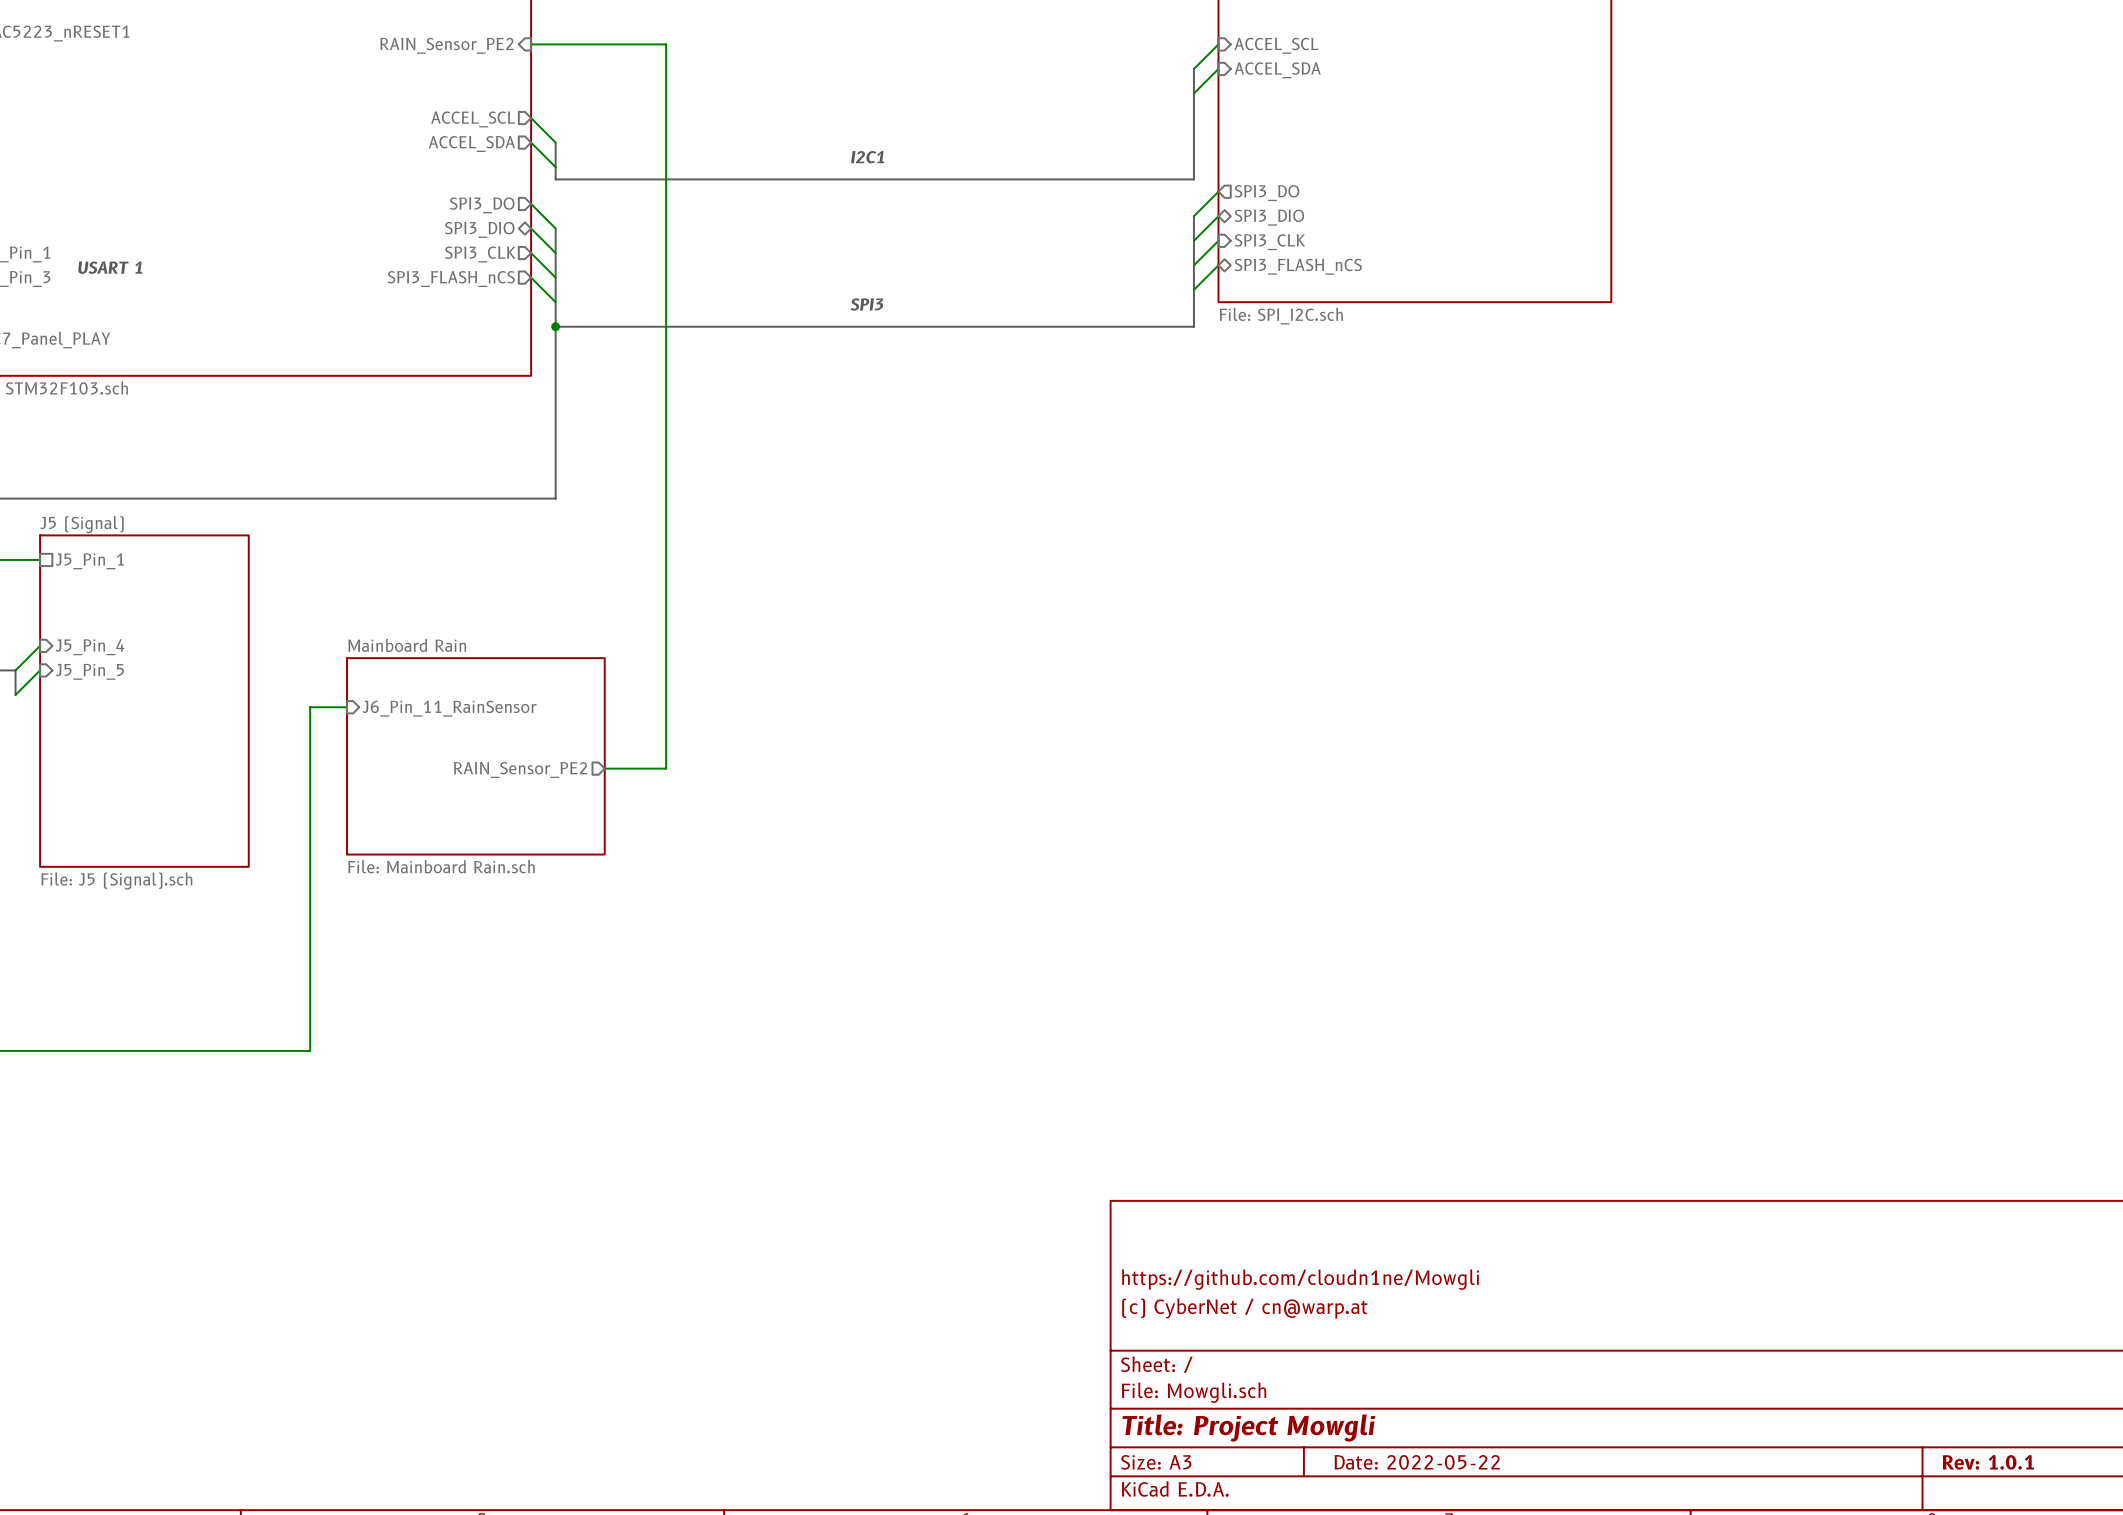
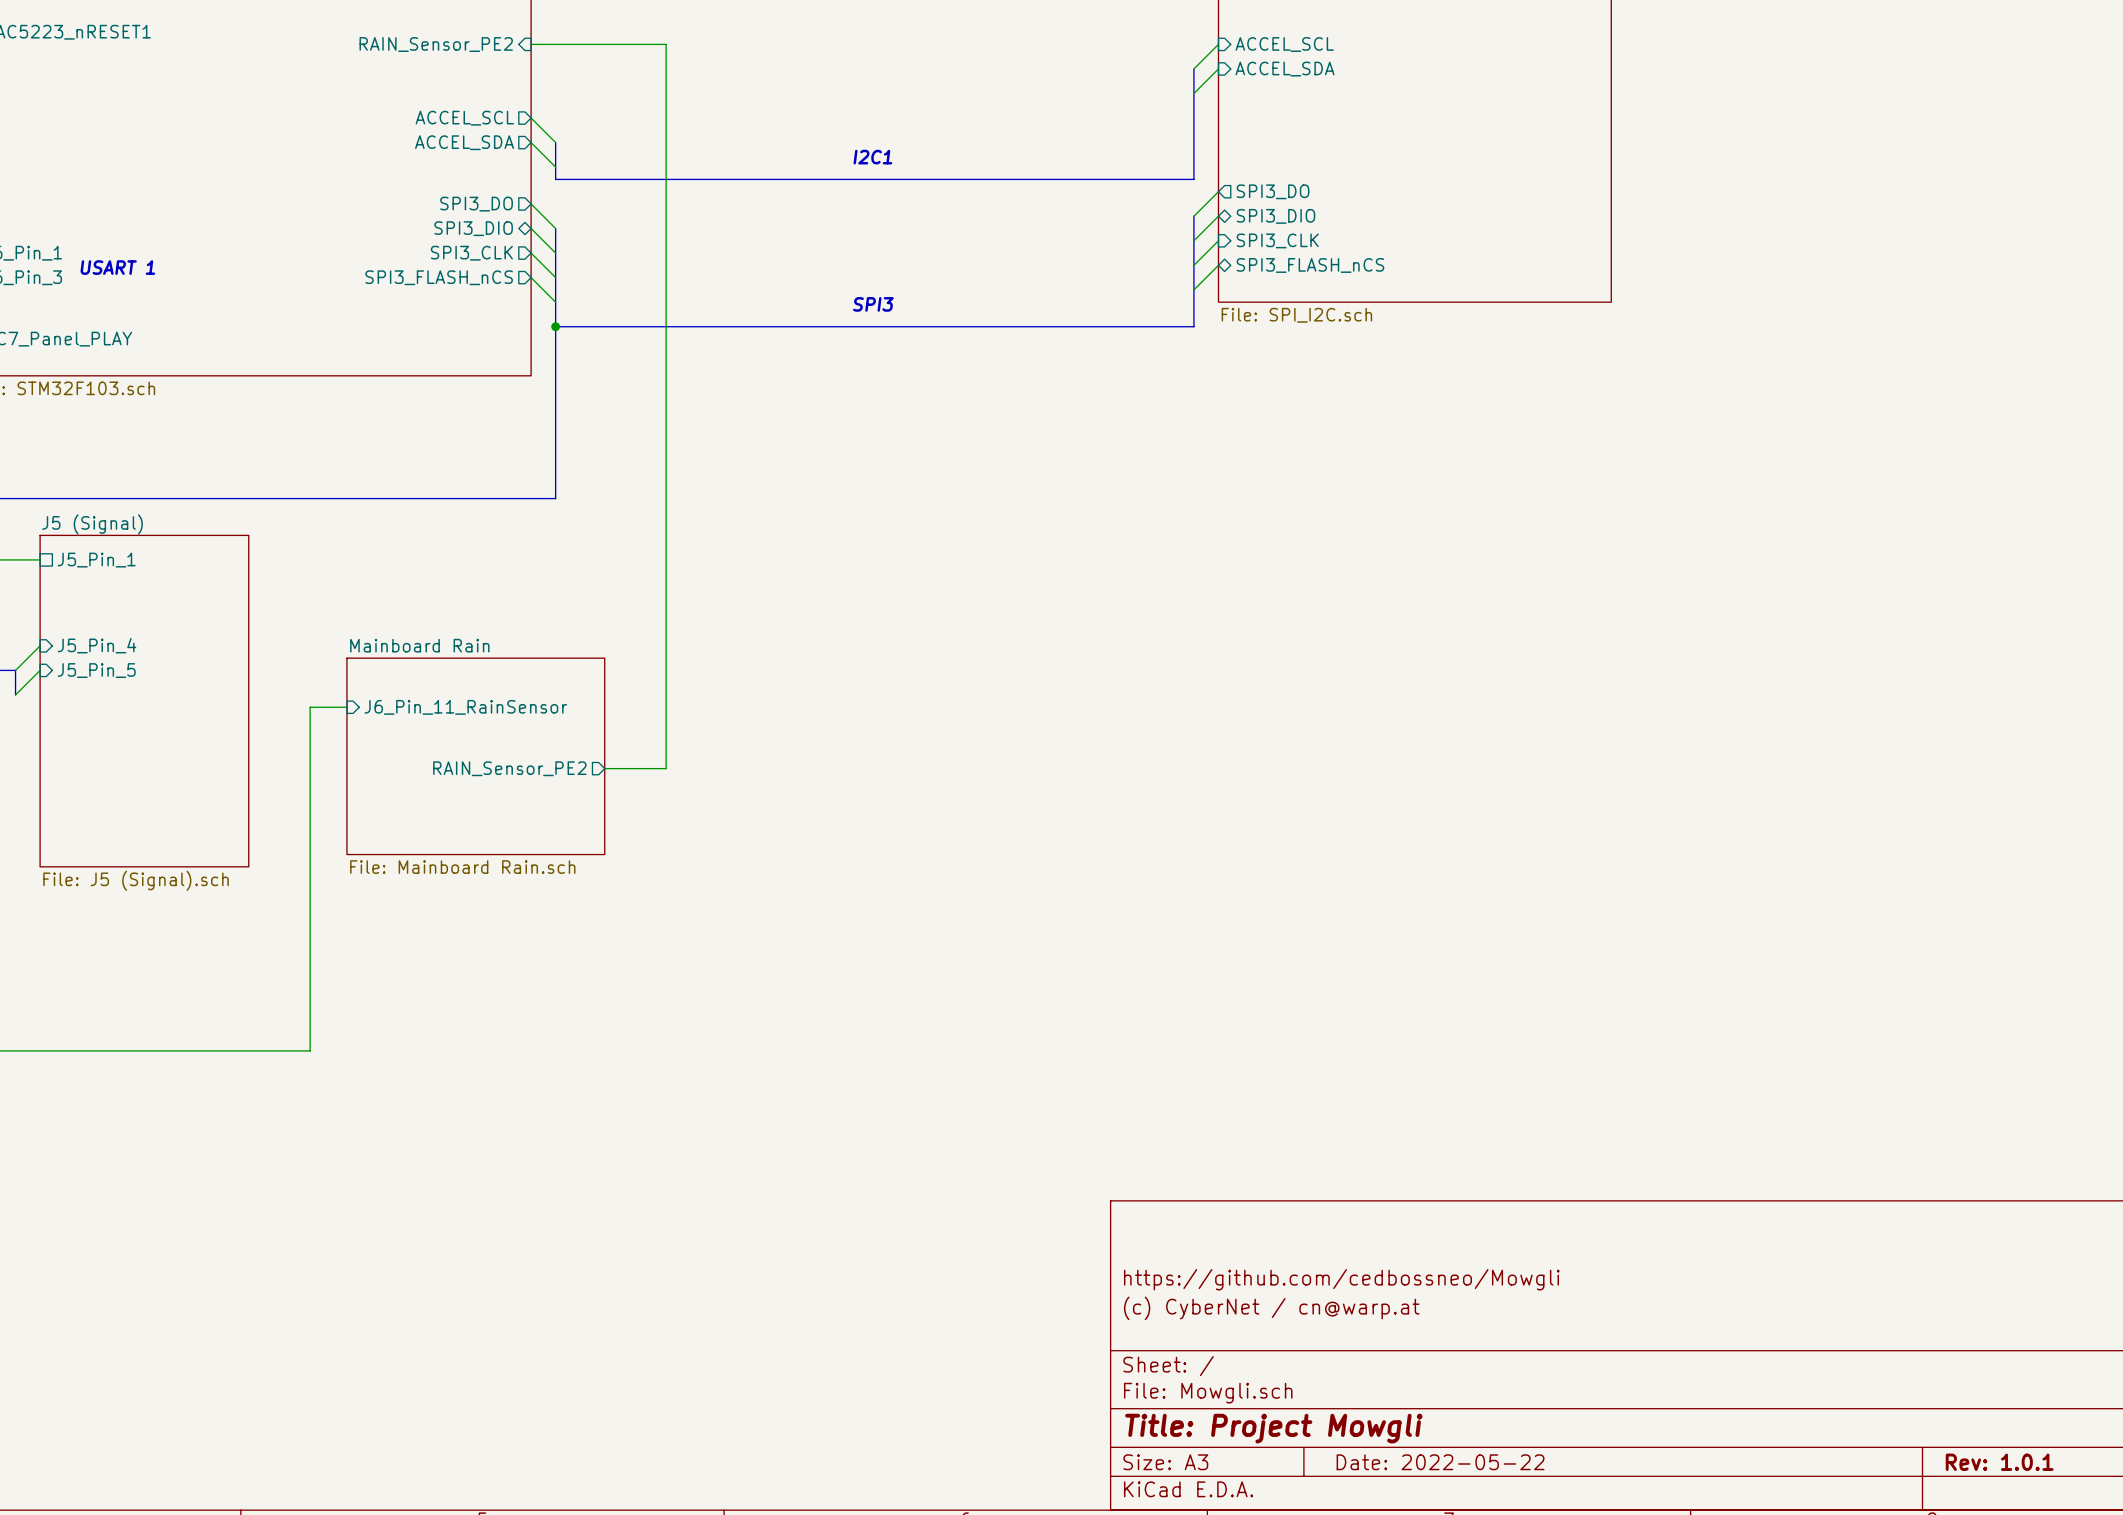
title block: https://github.com/cloudn1ne/Mowgli (1300, 1279) -> https://github.com/cedbossneo/Mowgli (1341, 1279)

